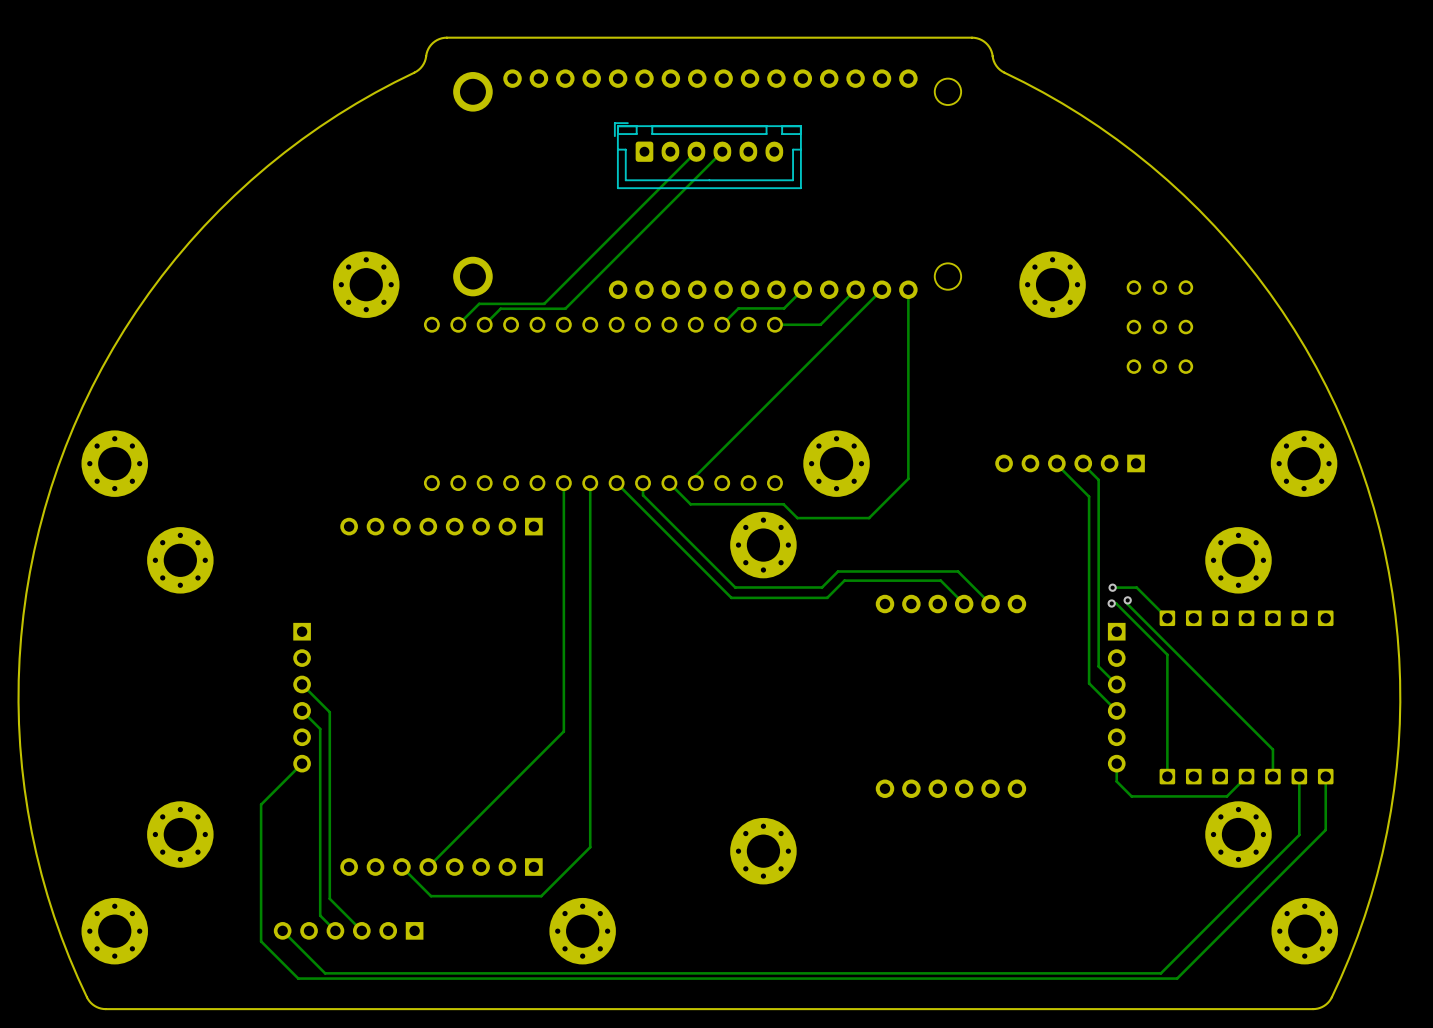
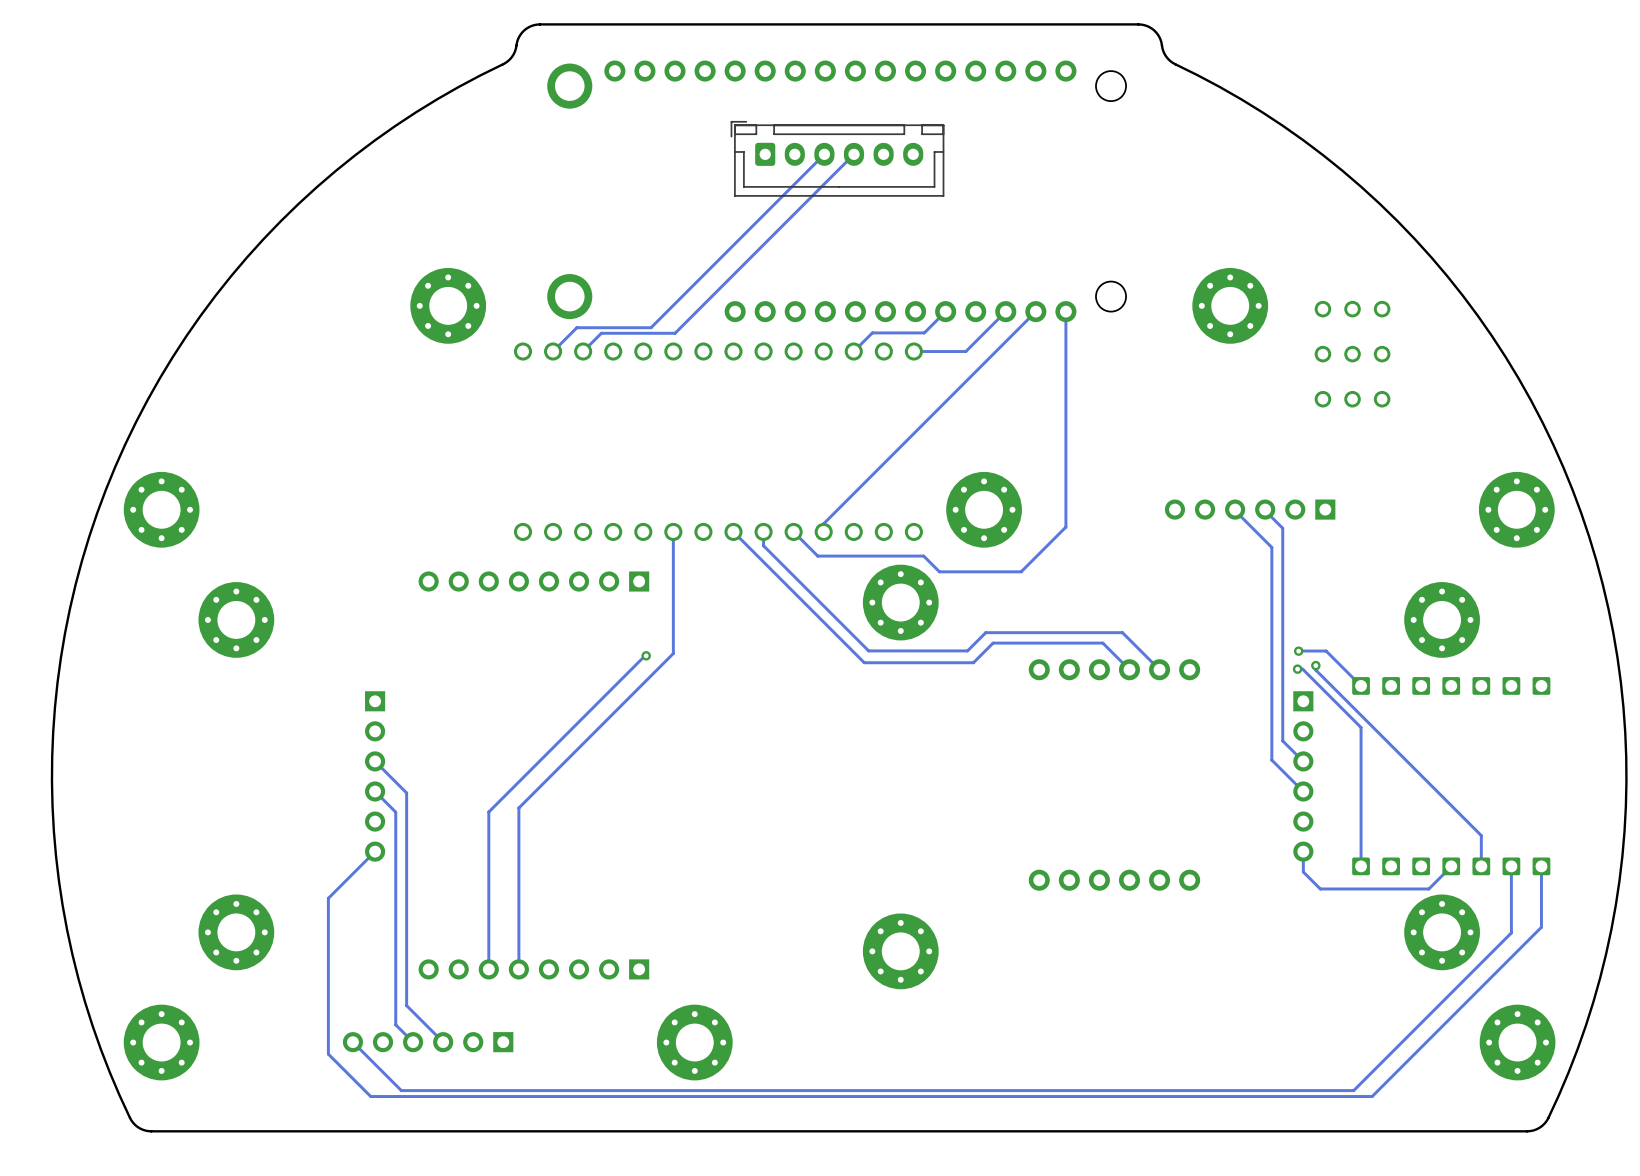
track: (590, 483) (590, 847) (541, 896) (431, 896) (401, 867) -> (646, 655) (488, 812) (488, 969)
track: (563, 589) (563, 731) (428, 867) -> (673, 653) (518, 807) (518, 969)
via: none -> (646, 655)

